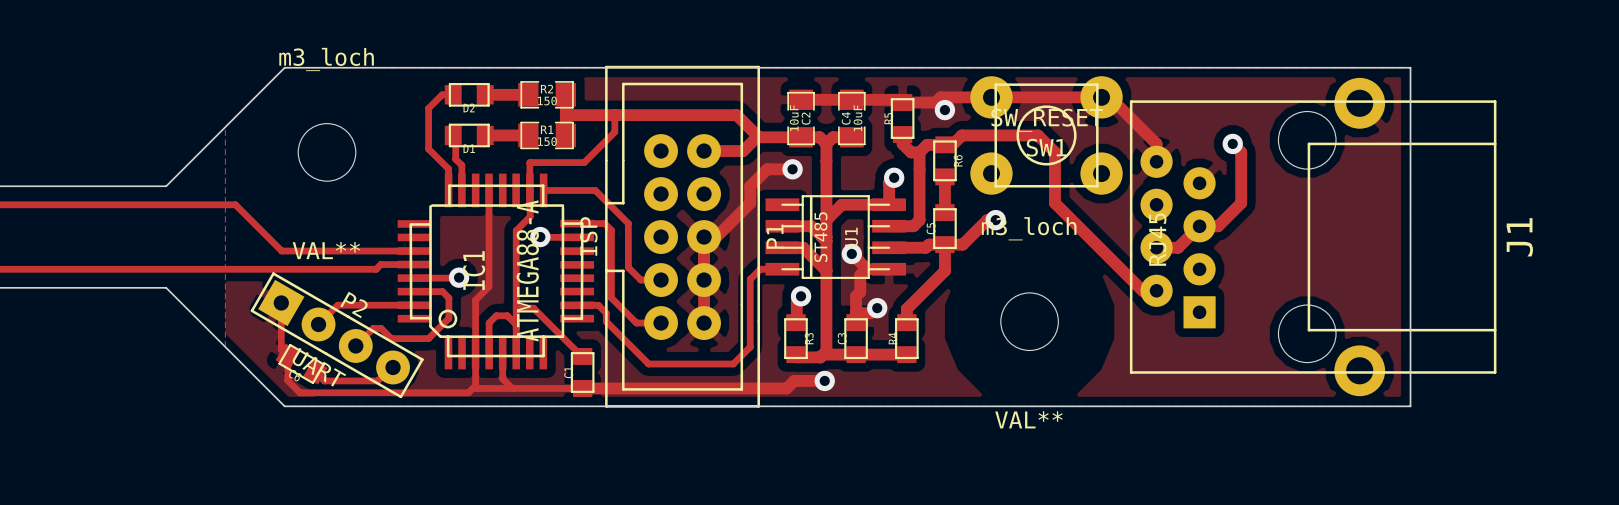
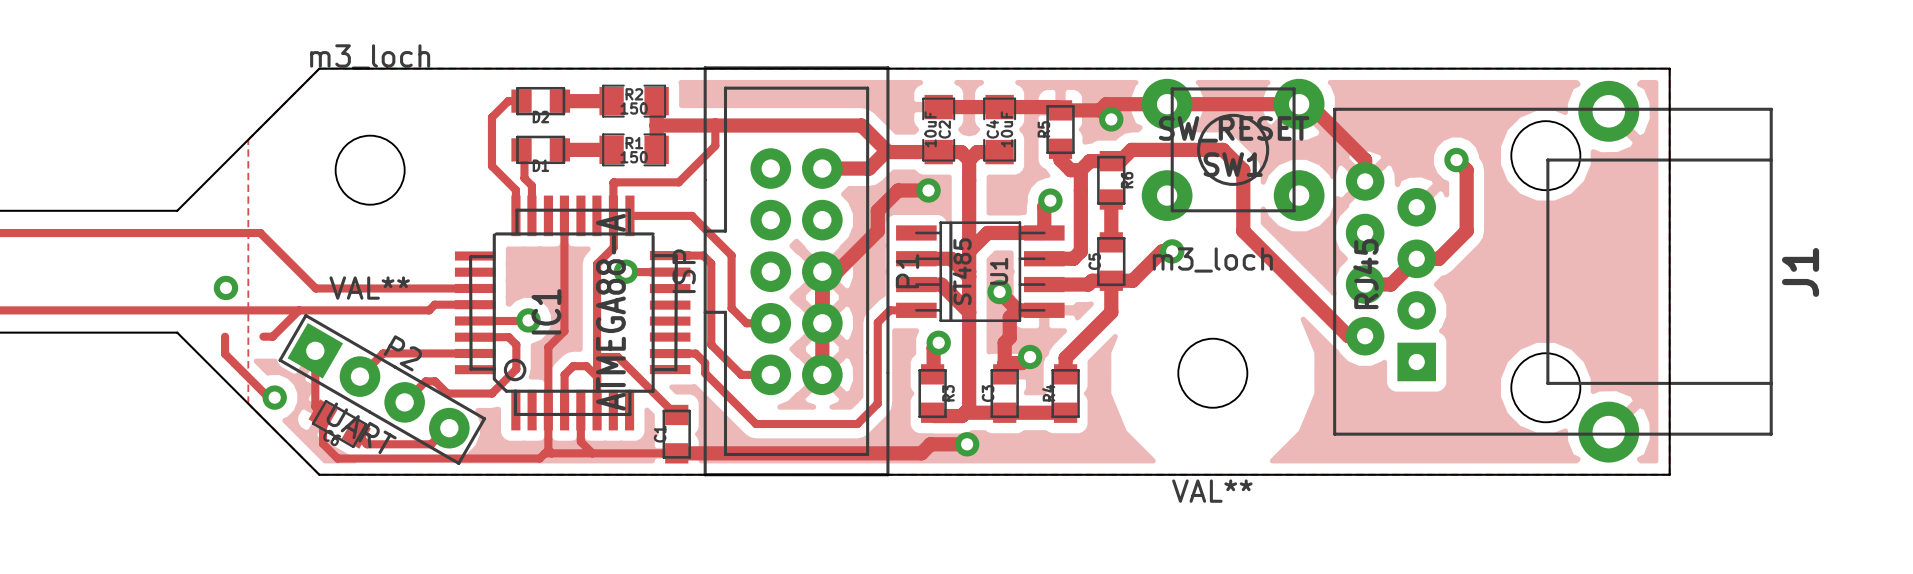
via: none -> (225, 287)
track: none -> (298, 310) (272, 336) (263, 336)
track: none -> (225, 336) (225, 354) (268, 397) (274, 397)
via: none -> (274, 397)

